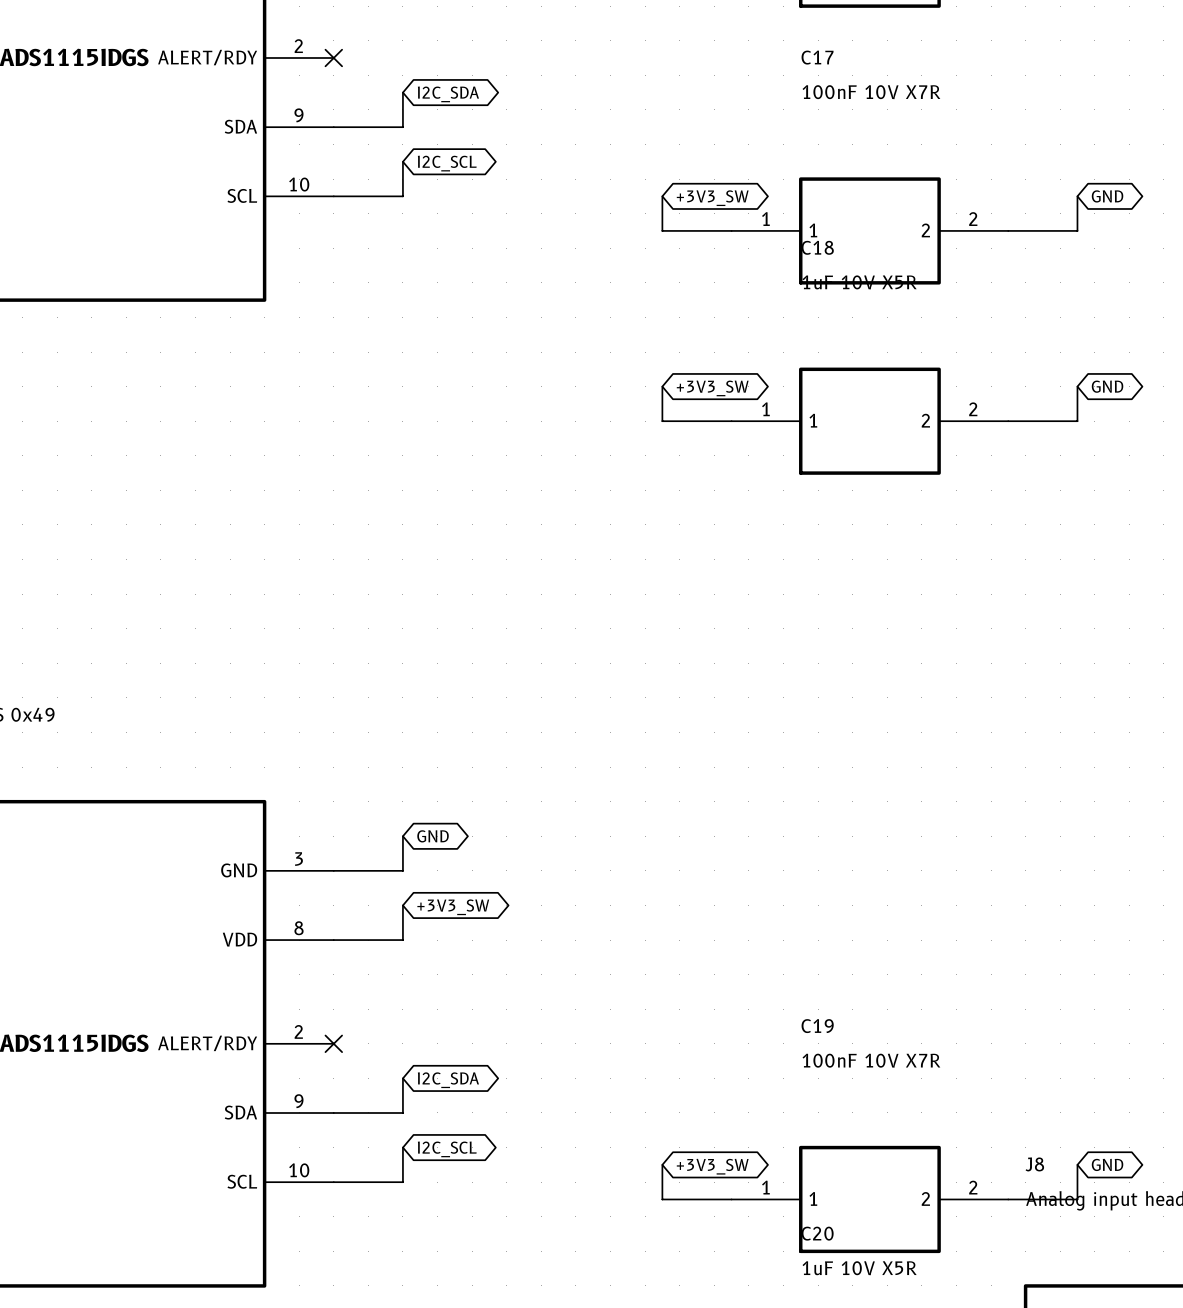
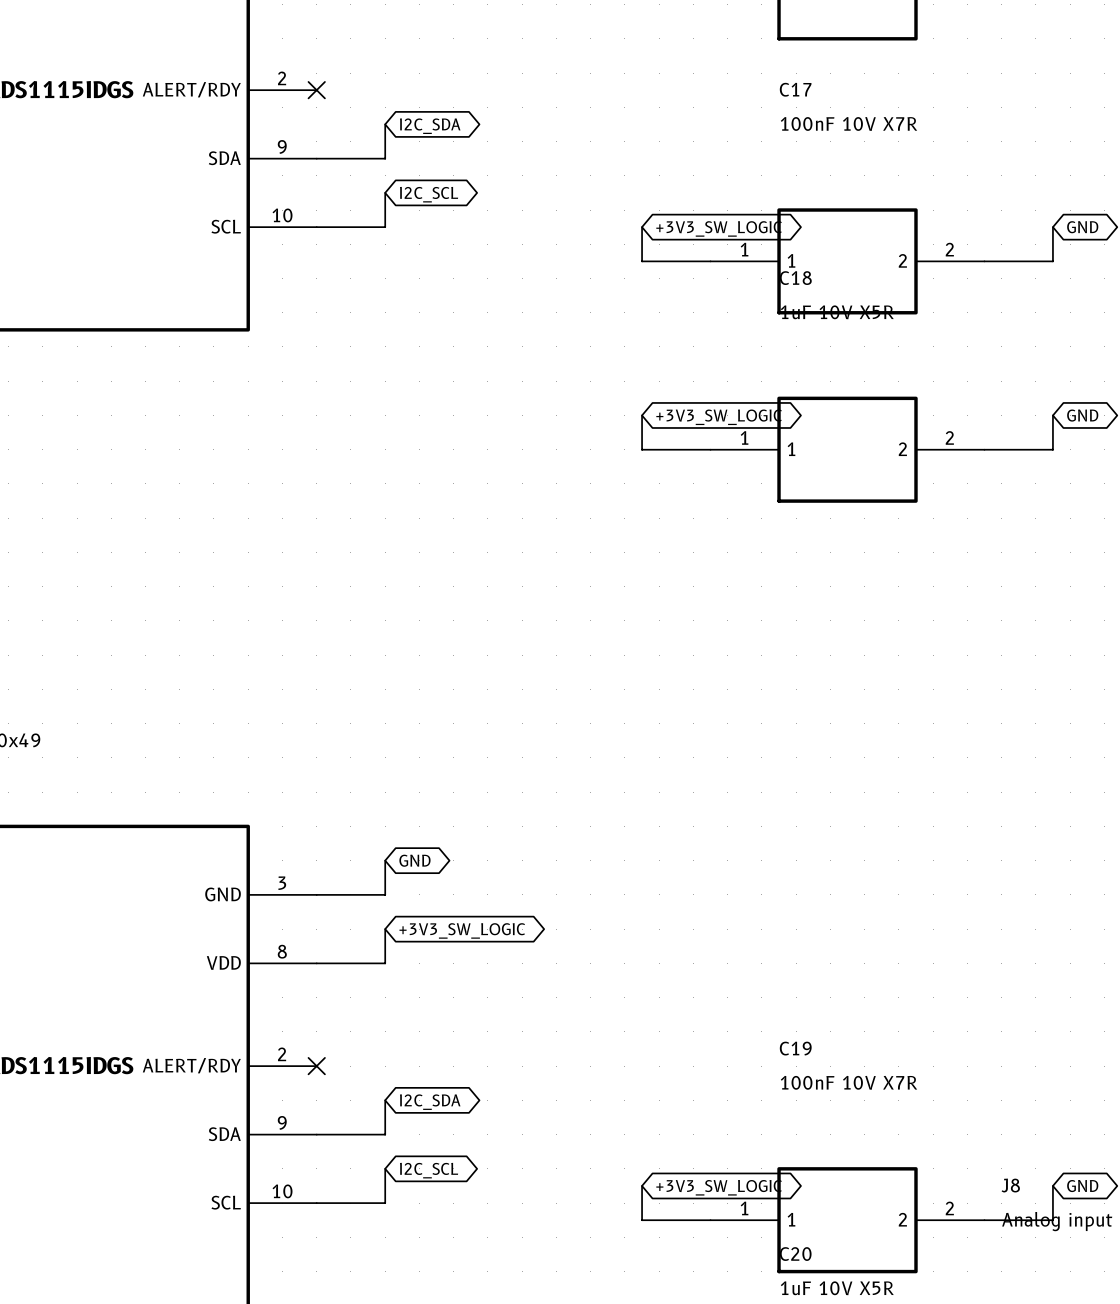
global label: +3V3_SW (712, 198) -> +3V3_SW_LOGIC (719, 228)
global label: +3V3_SW (712, 388) -> +3V3_SW_LOGIC (719, 417)
global label: +3V3_SW (453, 907) -> +3V3_SW_LOGIC (462, 930)
global label: +3V3_SW (712, 1166) -> +3V3_SW_LOGIC (719, 1187)

